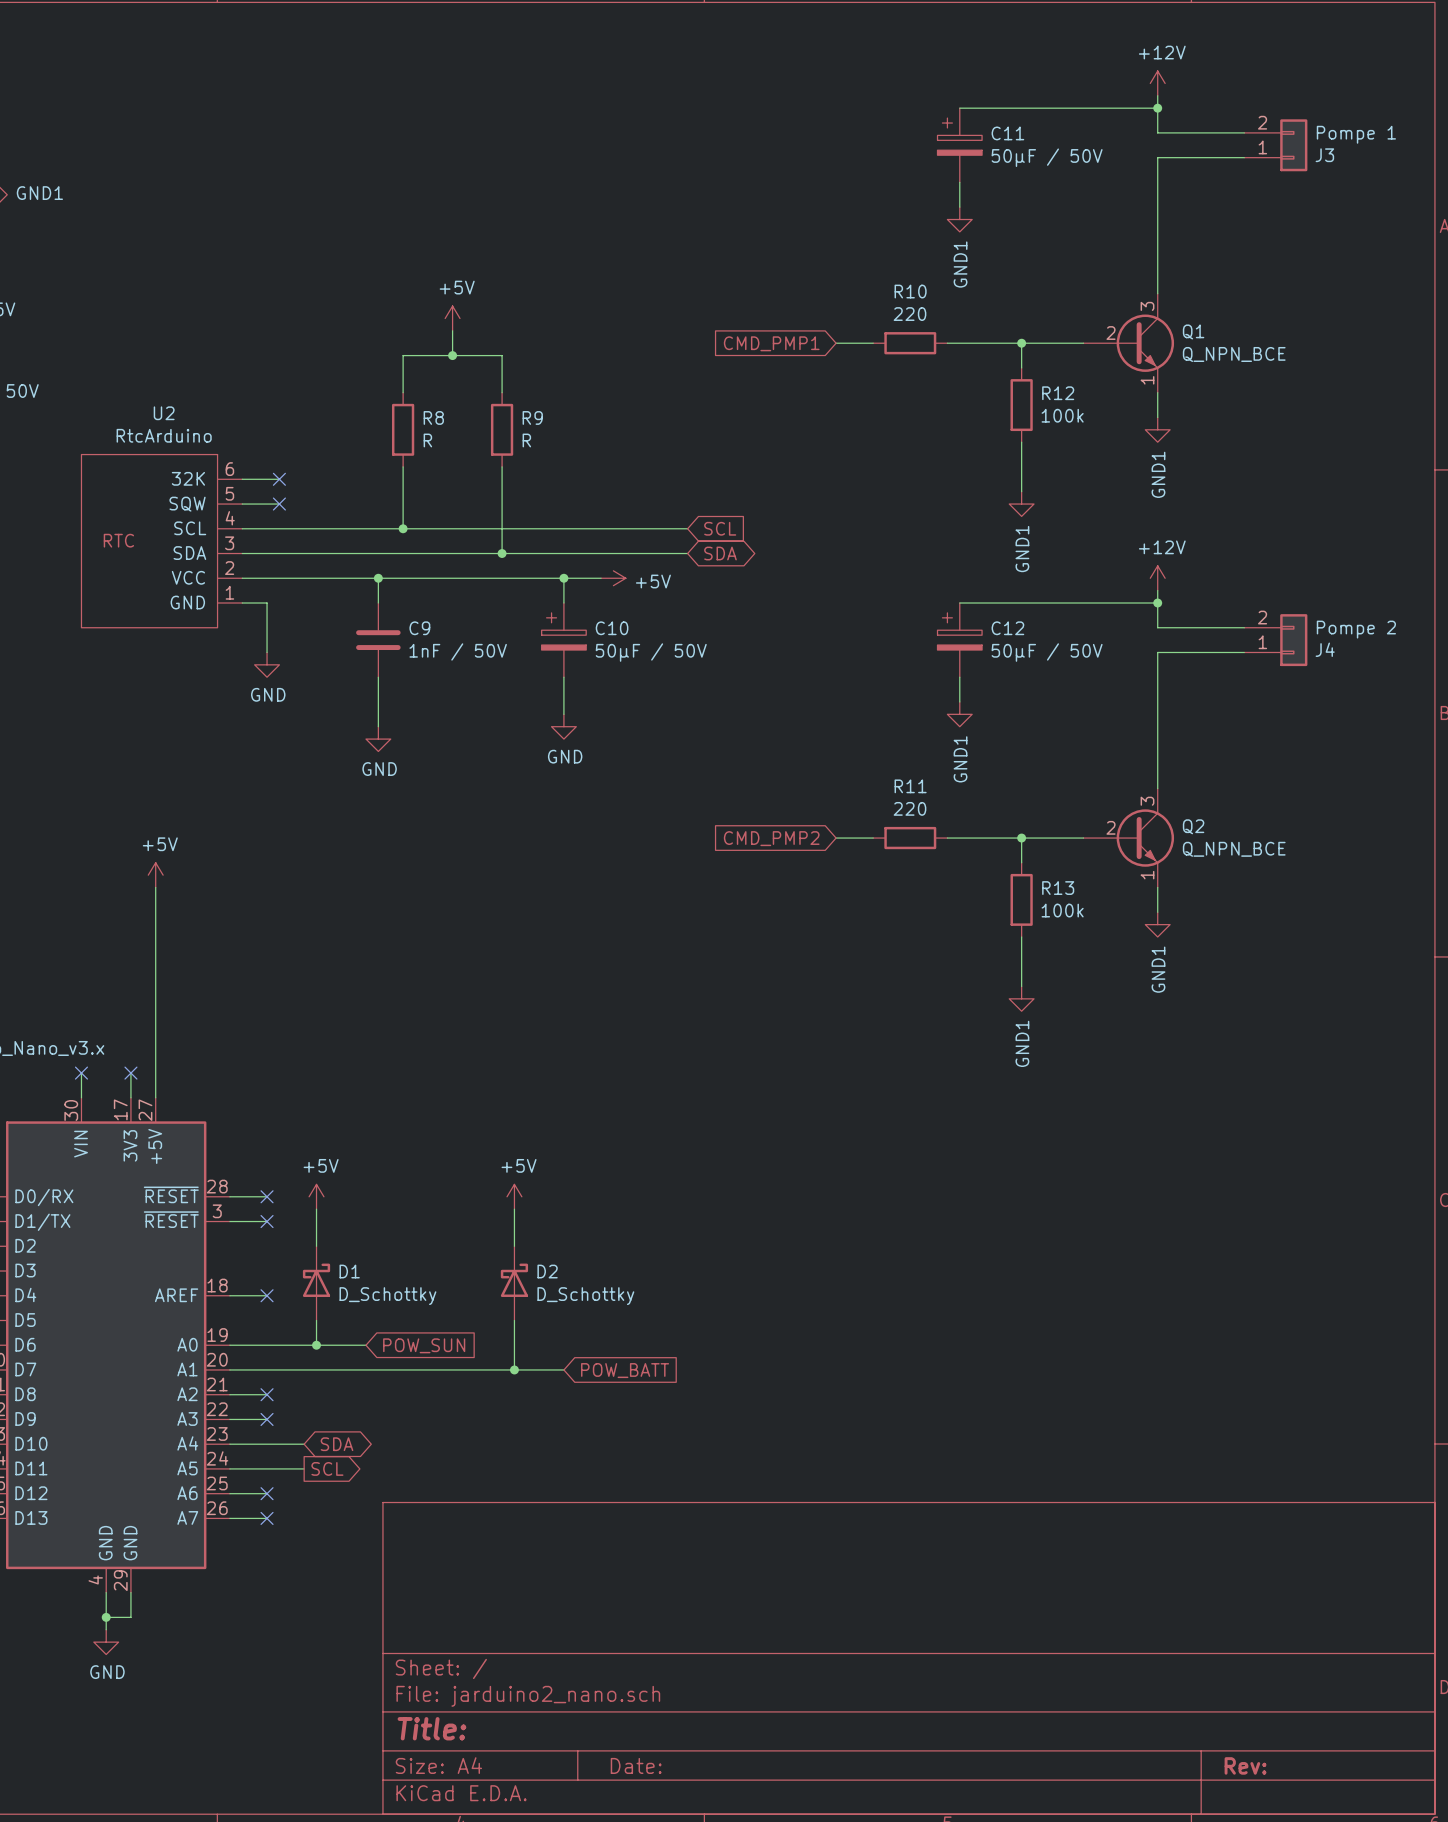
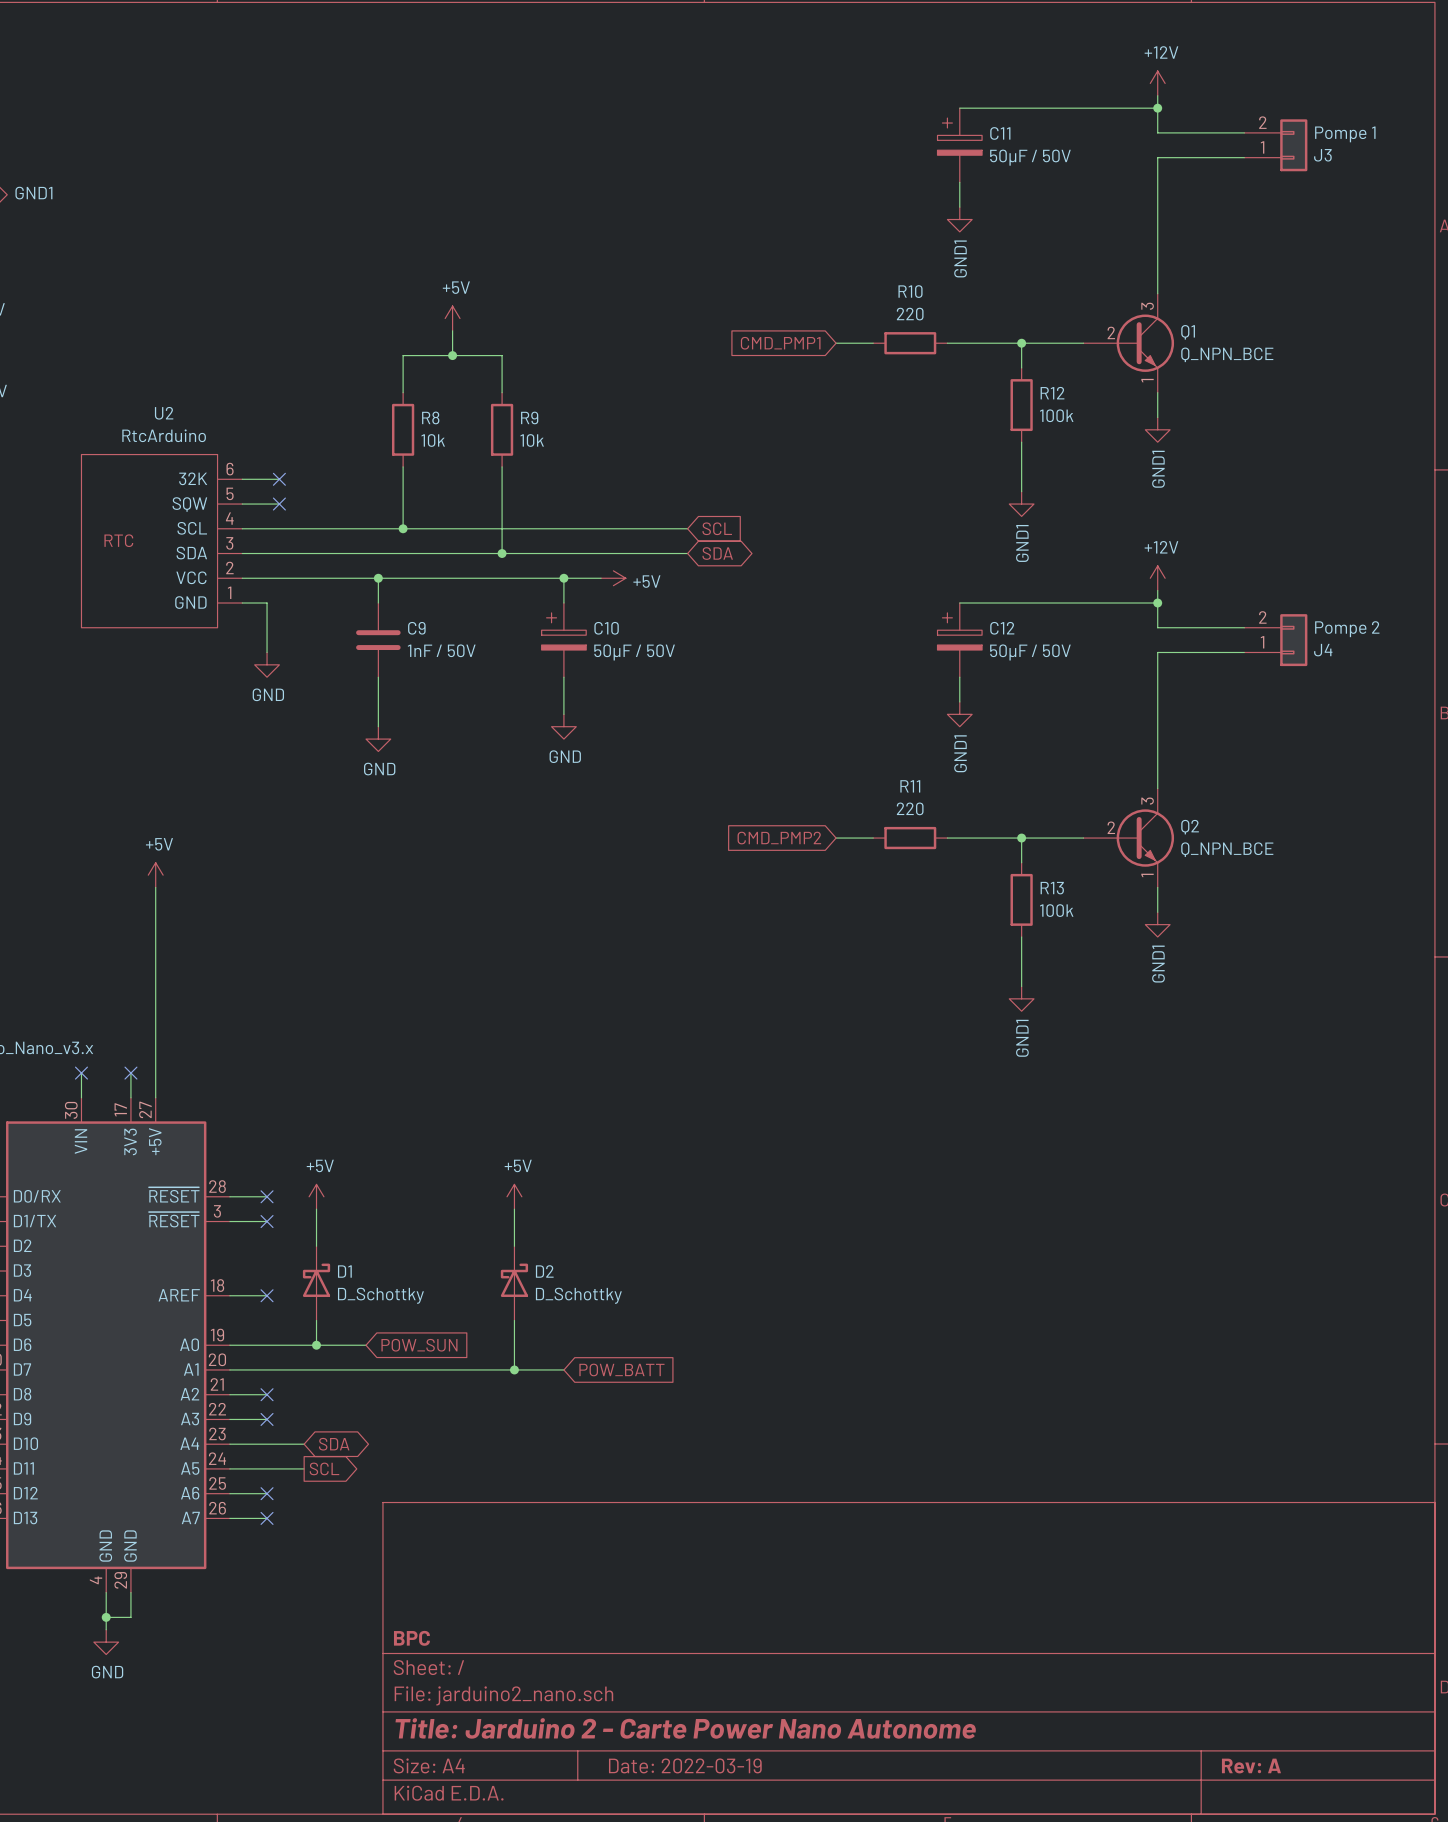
R8 value: R (427, 440) -> 10k (433, 440)
R9 value: R (526, 440) -> 10k (532, 440)
title block: none -> BPC (411, 1638)
title block: Title: (431, 1728) -> Title: Jarduino 2 - Carte Power Nano Autonome (685, 1728)
title block: Date: (636, 1765) -> Date: 2022-03-19 (685, 1765)
title block: Rev: (1245, 1765) -> Rev: A (1251, 1766)

